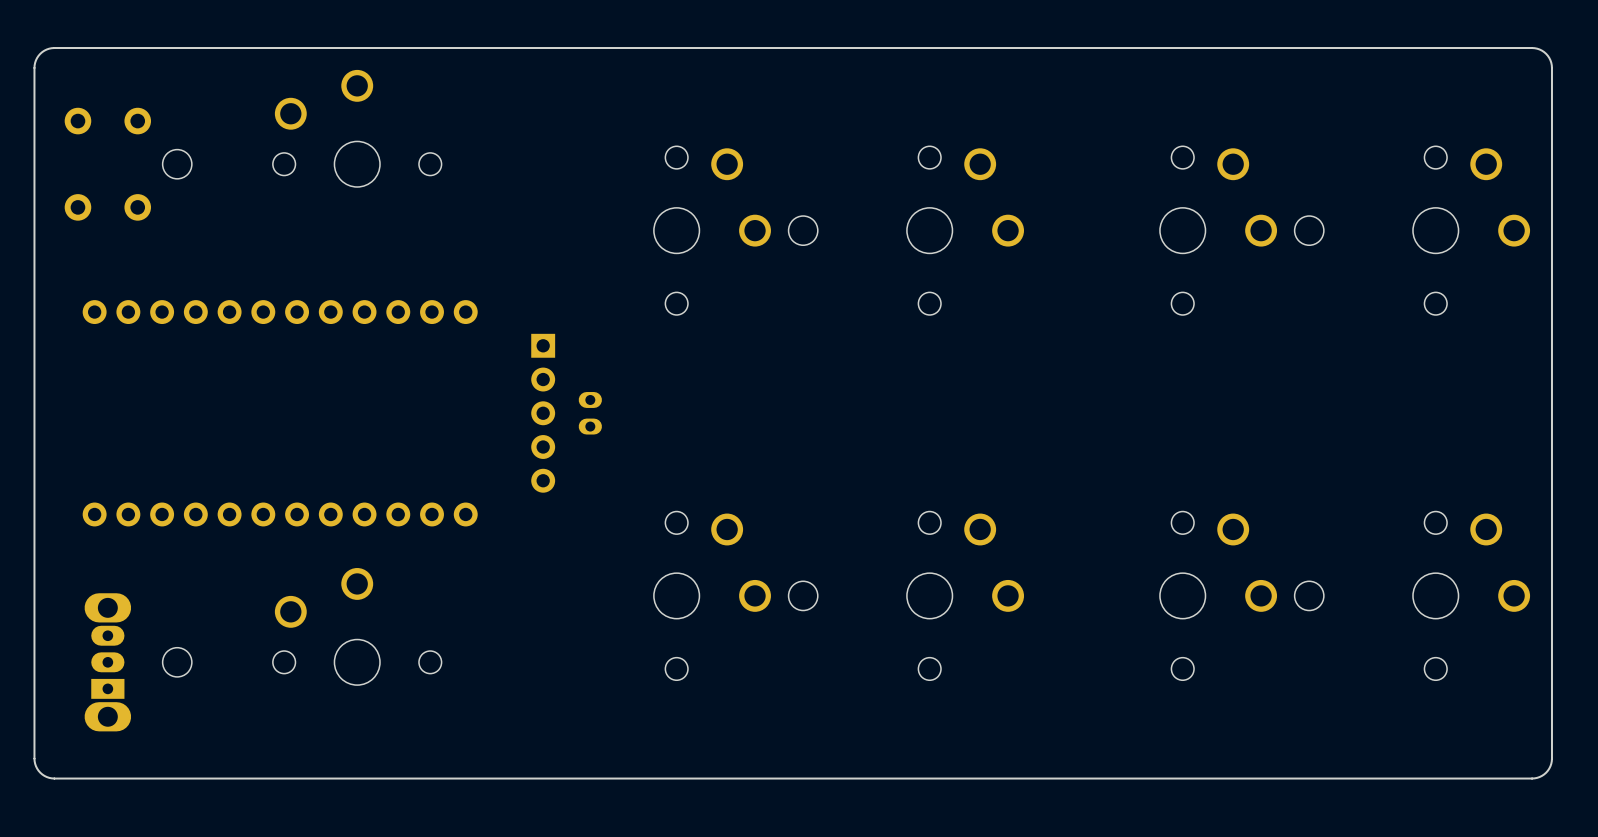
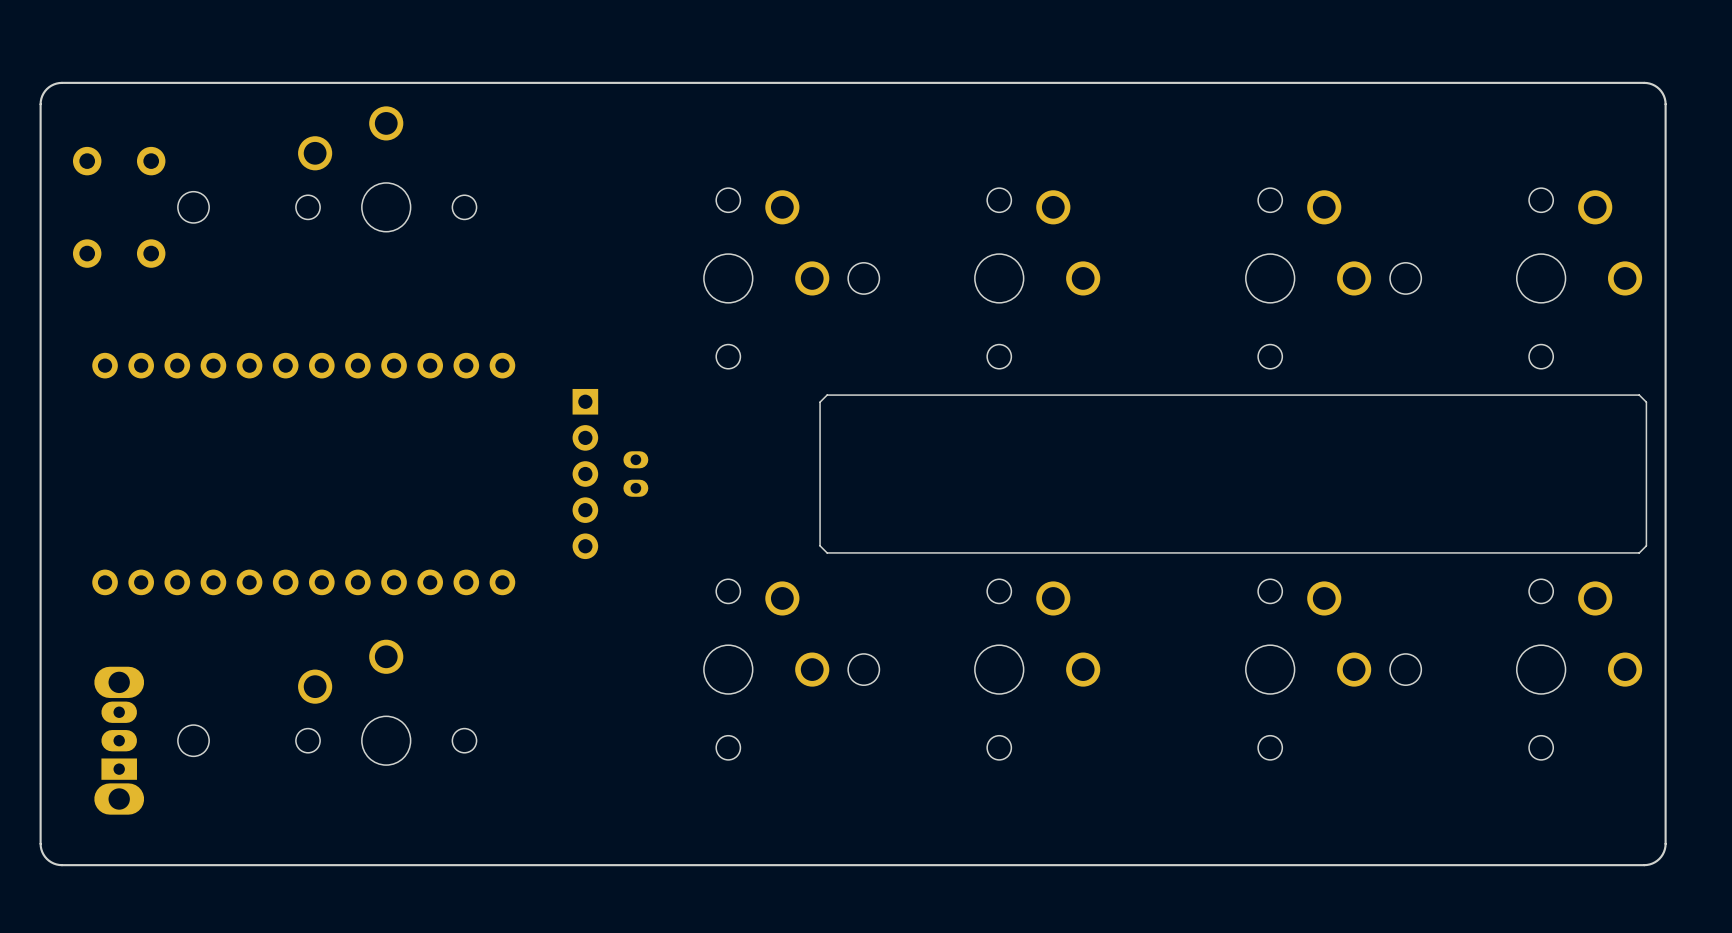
drawing: none -> [819, 394, 1647, 554]

